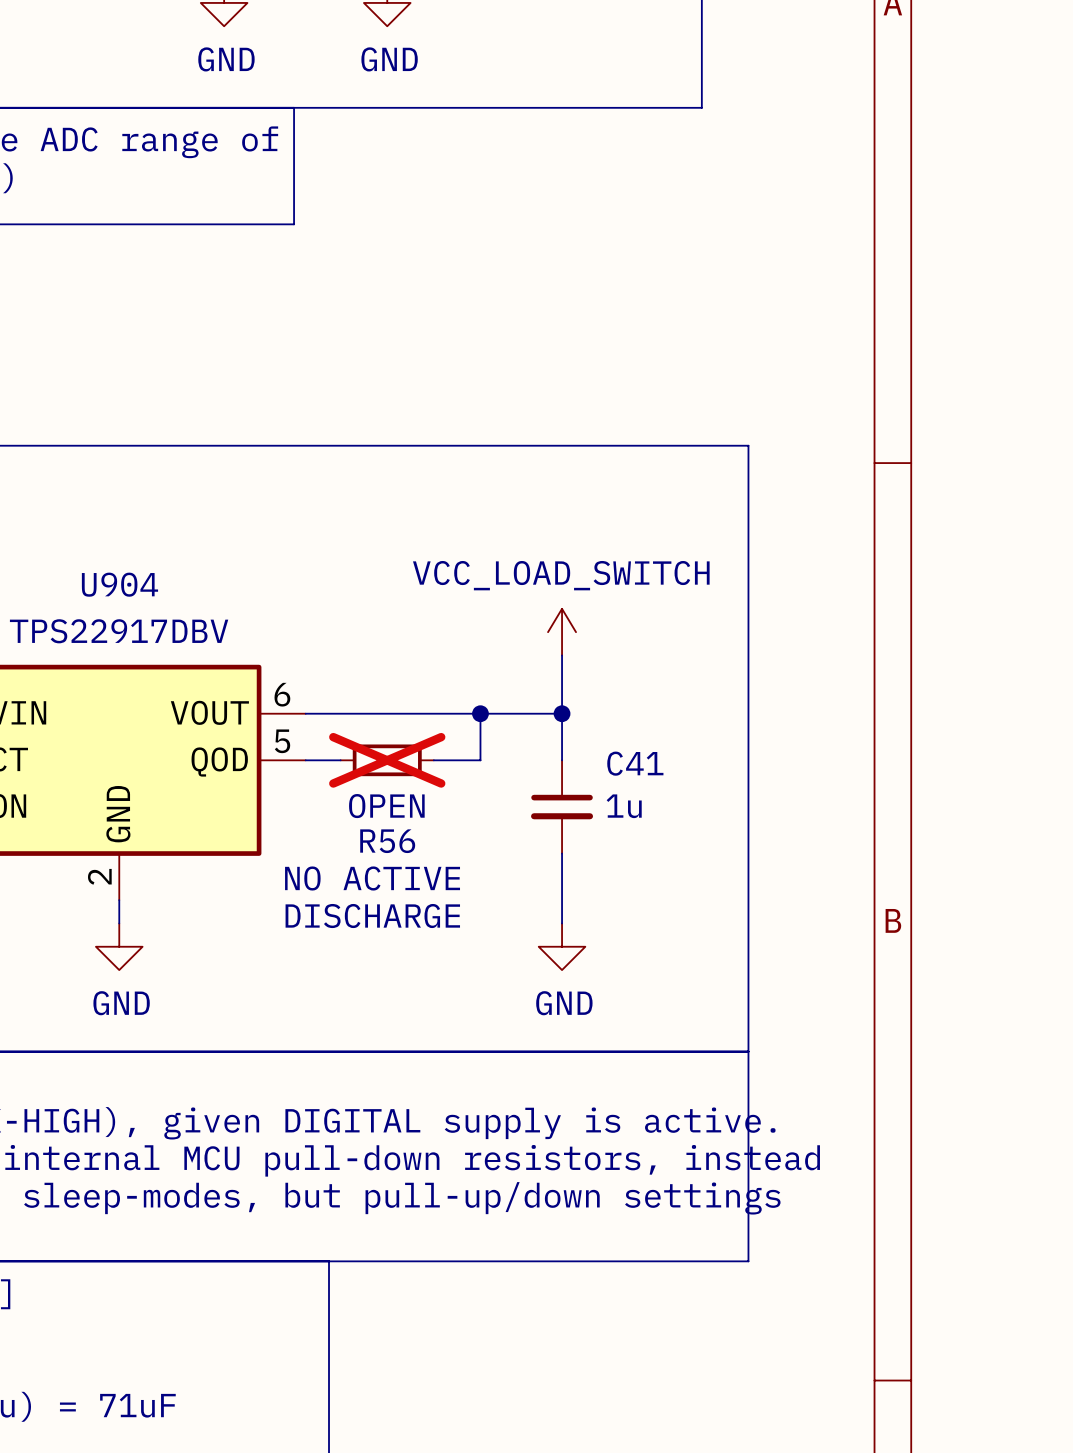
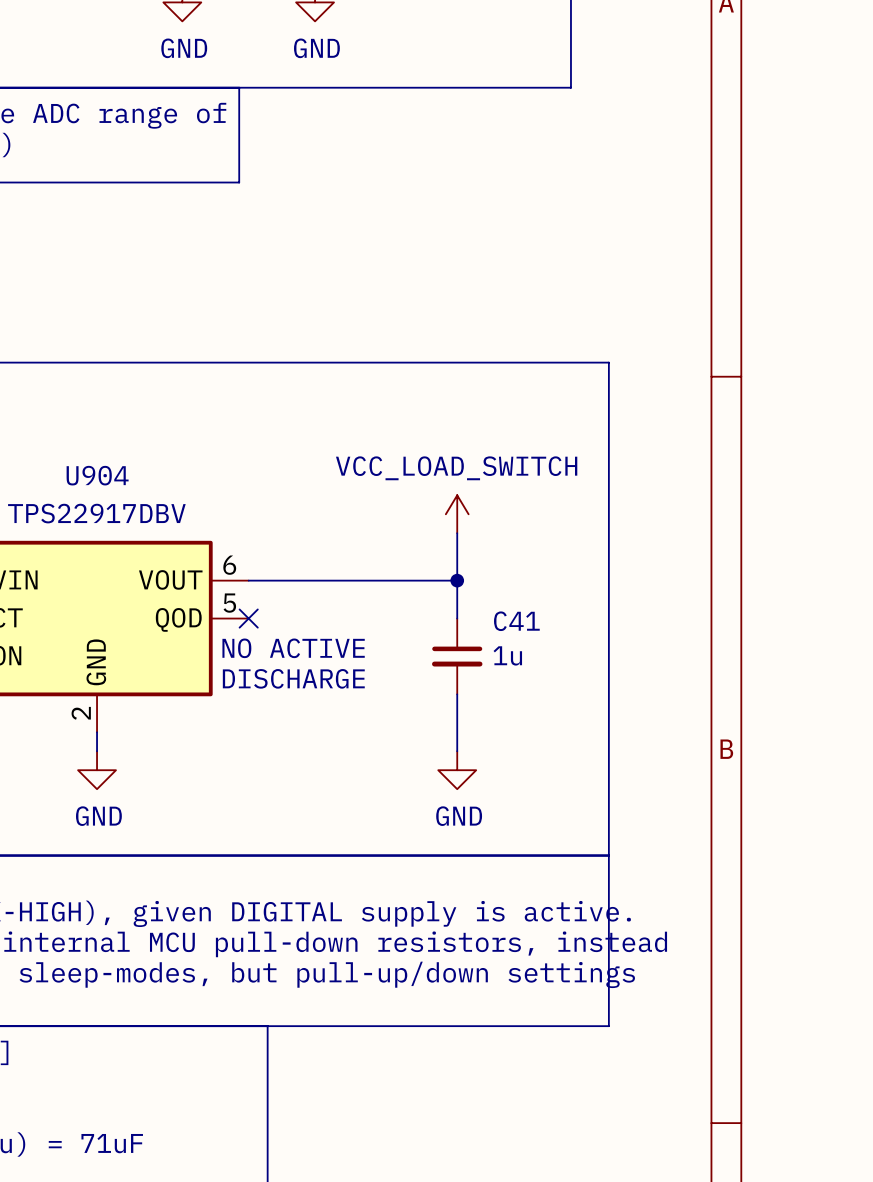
wire: (480, 713) (480, 760) (433, 760) -> none
junction: (480, 713) -> none
wire: (305, 760) (340, 760) -> none
no-connect mark: none -> (248, 618)
R56: OPEN (387, 760) -> none
text position: NO ACTIVE (372, 878) -> NO ACTIVE (293, 648)
text position: DISCHARGE (372, 916) -> DISCHARGE (293, 678)

